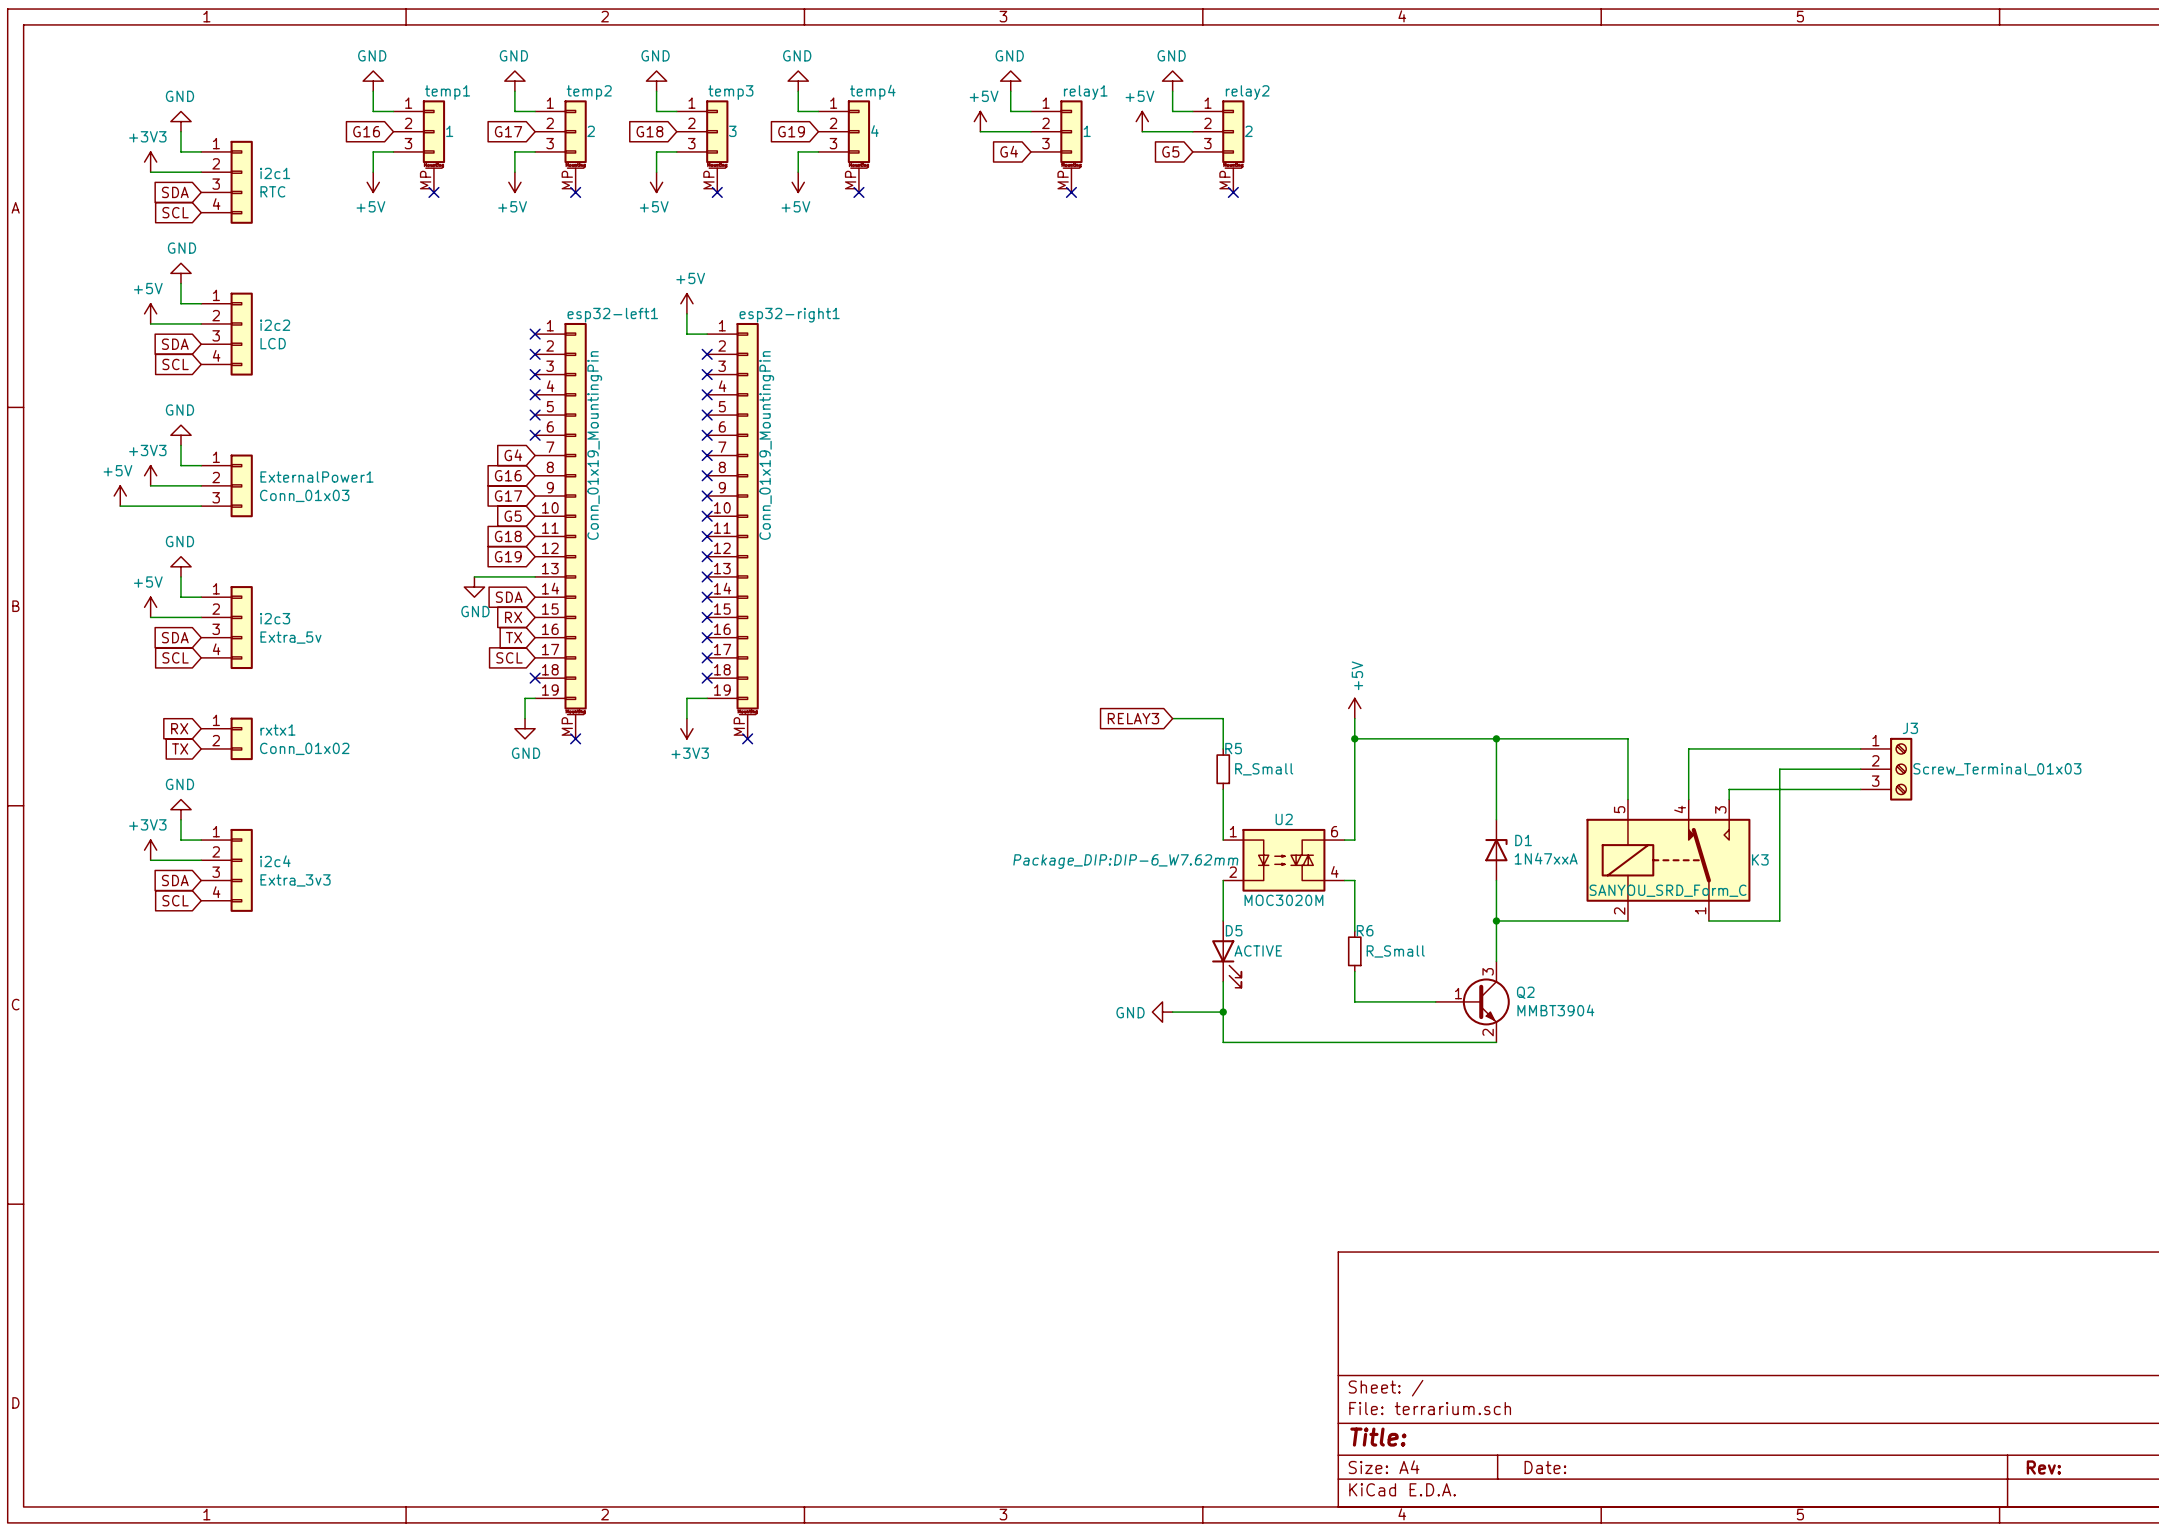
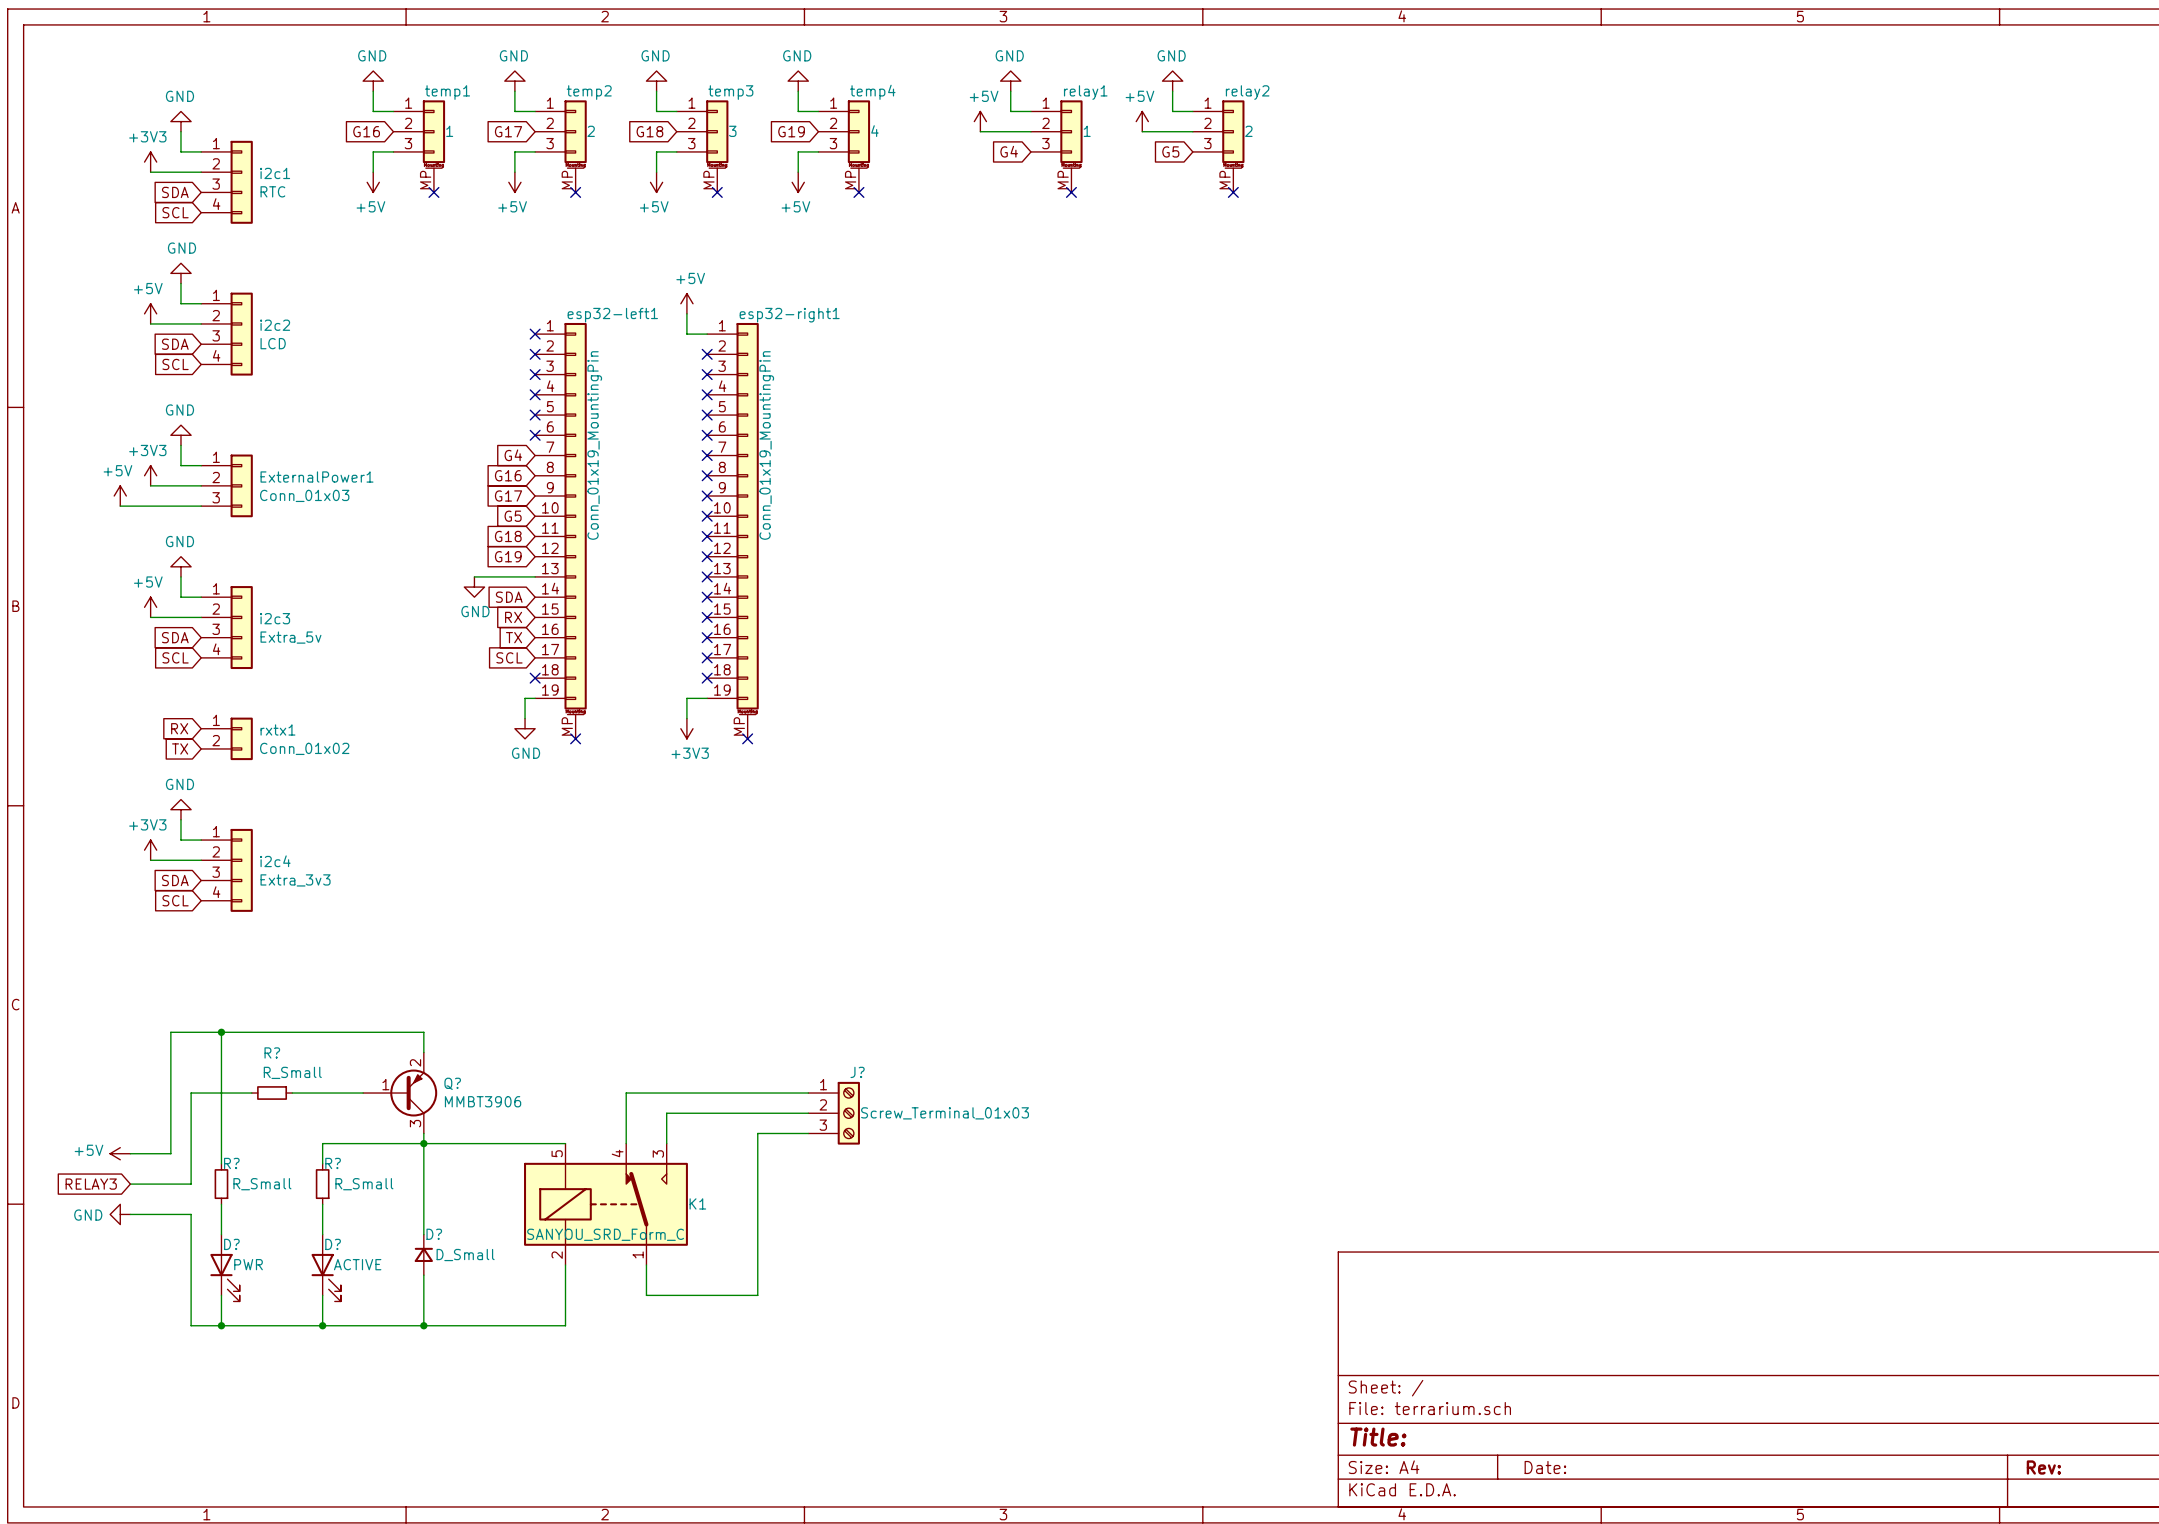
power symbol: +5V (1354, 708) -> none
global label: RELAY3 (1133, 718) -> none
wire: (1172, 718) (1223, 718) (1223, 748) -> none
wire: (1354, 718) (1354, 840) (1344, 840) -> none
wire: (1354, 738) (1627, 738) (1627, 799) -> none
junction: (1354, 738) -> none
wire: (1496, 738) (1496, 819) -> none
junction: (1496, 738) -> none
wire: (1860, 748) (1688, 748) (1688, 799) -> none
R5: R_Small (1223, 769) -> none
wire: (1860, 769) (1779, 769) (1779, 920) (1708, 920) -> none
J3: Screw_Terminal_01x03 (1886, 769) -> none
wire: (1223, 789) (1223, 840) -> none
wire: (1860, 789) (1729, 789) (1729, 799) -> none
D1: 1N47xxA (1496, 850) -> none
U2: MOC3020M (1283, 860) -> none
K3: SANYOU_SRD_Form_C (1668, 860) -> none
wire: (1223, 880) (1223, 920) -> none
wire: (1344, 880) (1354, 880) (1354, 931) -> none
wire: (1496, 880) (1496, 961) -> none
wire: (1496, 920) (1627, 920) -> none
junction: (1496, 920) -> none
R6: R_Small (1354, 951) -> none
D5: ACTIVE (1226, 954) -> none
wire: (1354, 971) (1354, 1001) (1435, 1001) -> none
wire: (1223, 981) (1223, 1042) (1496, 1042) -> none
Q2: MMBT3904 (1472, 1001) -> none
power symbol: GND (1162, 1012) -> none
wire: (1172, 1012) (1223, 1012) -> none
junction: (1223, 1012) -> none
wire: none -> (221, 1032) (221, 1163)
junction: none -> (221, 1032)
wire: none -> (423, 1052) (423, 1032) (170, 1032) (170, 1153) (130, 1153)
wire: none -> (251, 1093) (191, 1093) (191, 1184) (130, 1184)
R?: none -> R_Small (272, 1093)
wire: none -> (292, 1093) (363, 1093)
Q?: none -> MMBT3906 (400, 1093)
wire: none -> (808, 1093) (626, 1093) (626, 1143)
wire: none -> (808, 1113) (666, 1113) (666, 1143)
J?: none -> Screw_Terminal_01x03 (834, 1113)
wire: none -> (423, 1133) (423, 1234)
wire: none -> (808, 1133) (757, 1133) (757, 1295) (646, 1295) (646, 1265)
junction: none -> (423, 1143)
wire: none -> (565, 1143) (322, 1143) (322, 1163)
power symbol: none -> +5V (120, 1153)
global label: none -> RELAY3 (91, 1184)
R?: none -> R_Small (221, 1184)
R?: none -> R_Small (322, 1184)
wire: none -> (221, 1204) (221, 1234)
wire: none -> (322, 1204) (322, 1234)
K1: none -> SANYOU_SRD_Form_C (605, 1204)
power symbol: none -> GND (120, 1214)
wire: none -> (130, 1214) (191, 1214) (191, 1325) (565, 1325) (565, 1265)
D?: none -> D_Small (423, 1254)
D?: none -> PWR (225, 1268)
D?: none -> ACTIVE (326, 1268)
wire: none -> (423, 1275) (423, 1325)
wire: none -> (221, 1295) (221, 1325)
wire: none -> (322, 1295) (322, 1325)
junction: none -> (221, 1325)
junction: none -> (322, 1325)
junction: none -> (423, 1325)

